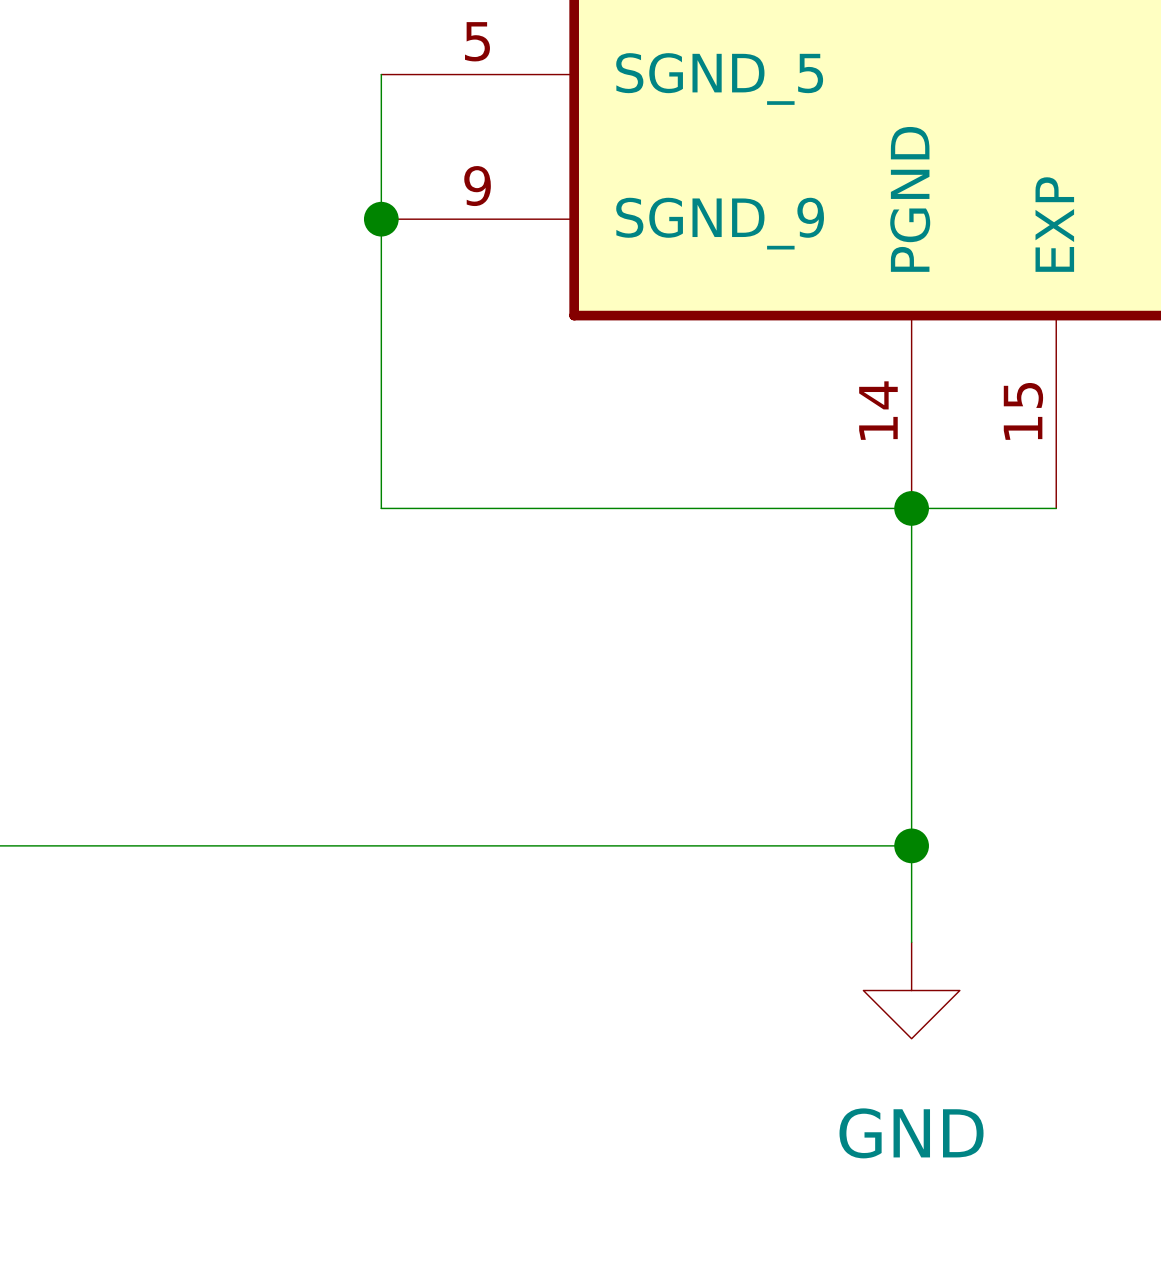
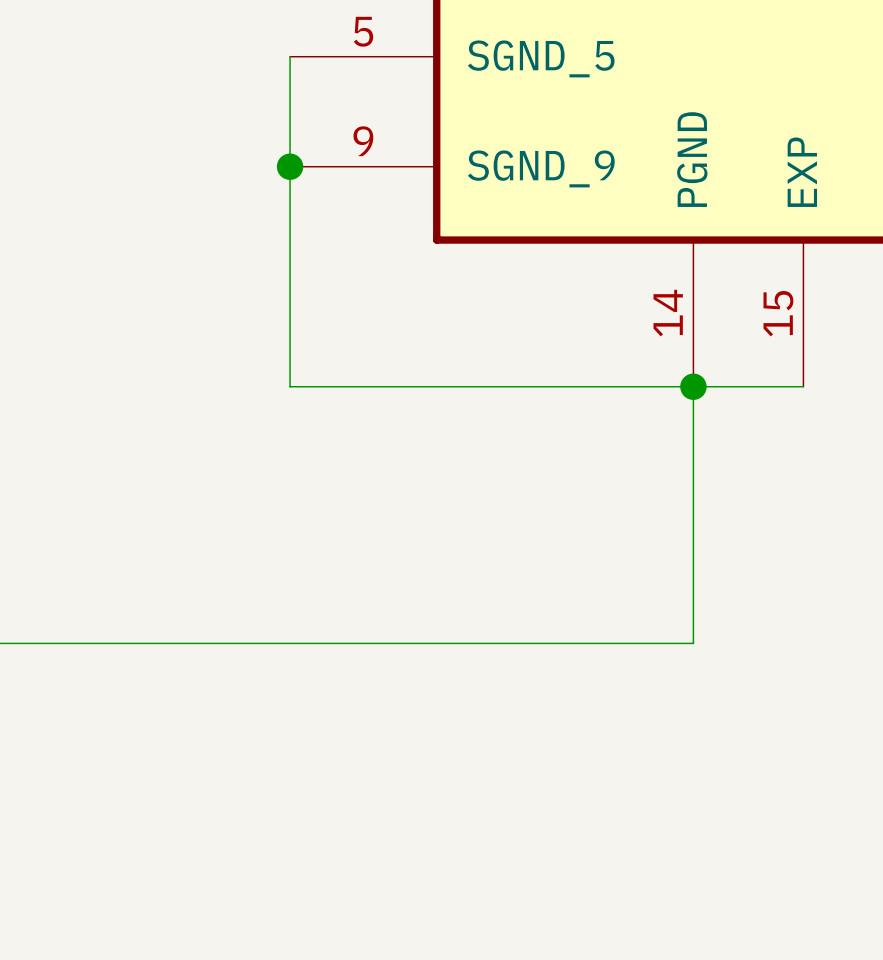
wire: (911, 845) (911, 942) -> none
junction: (911, 845) -> none
power symbol: GND (911, 990) -> none

